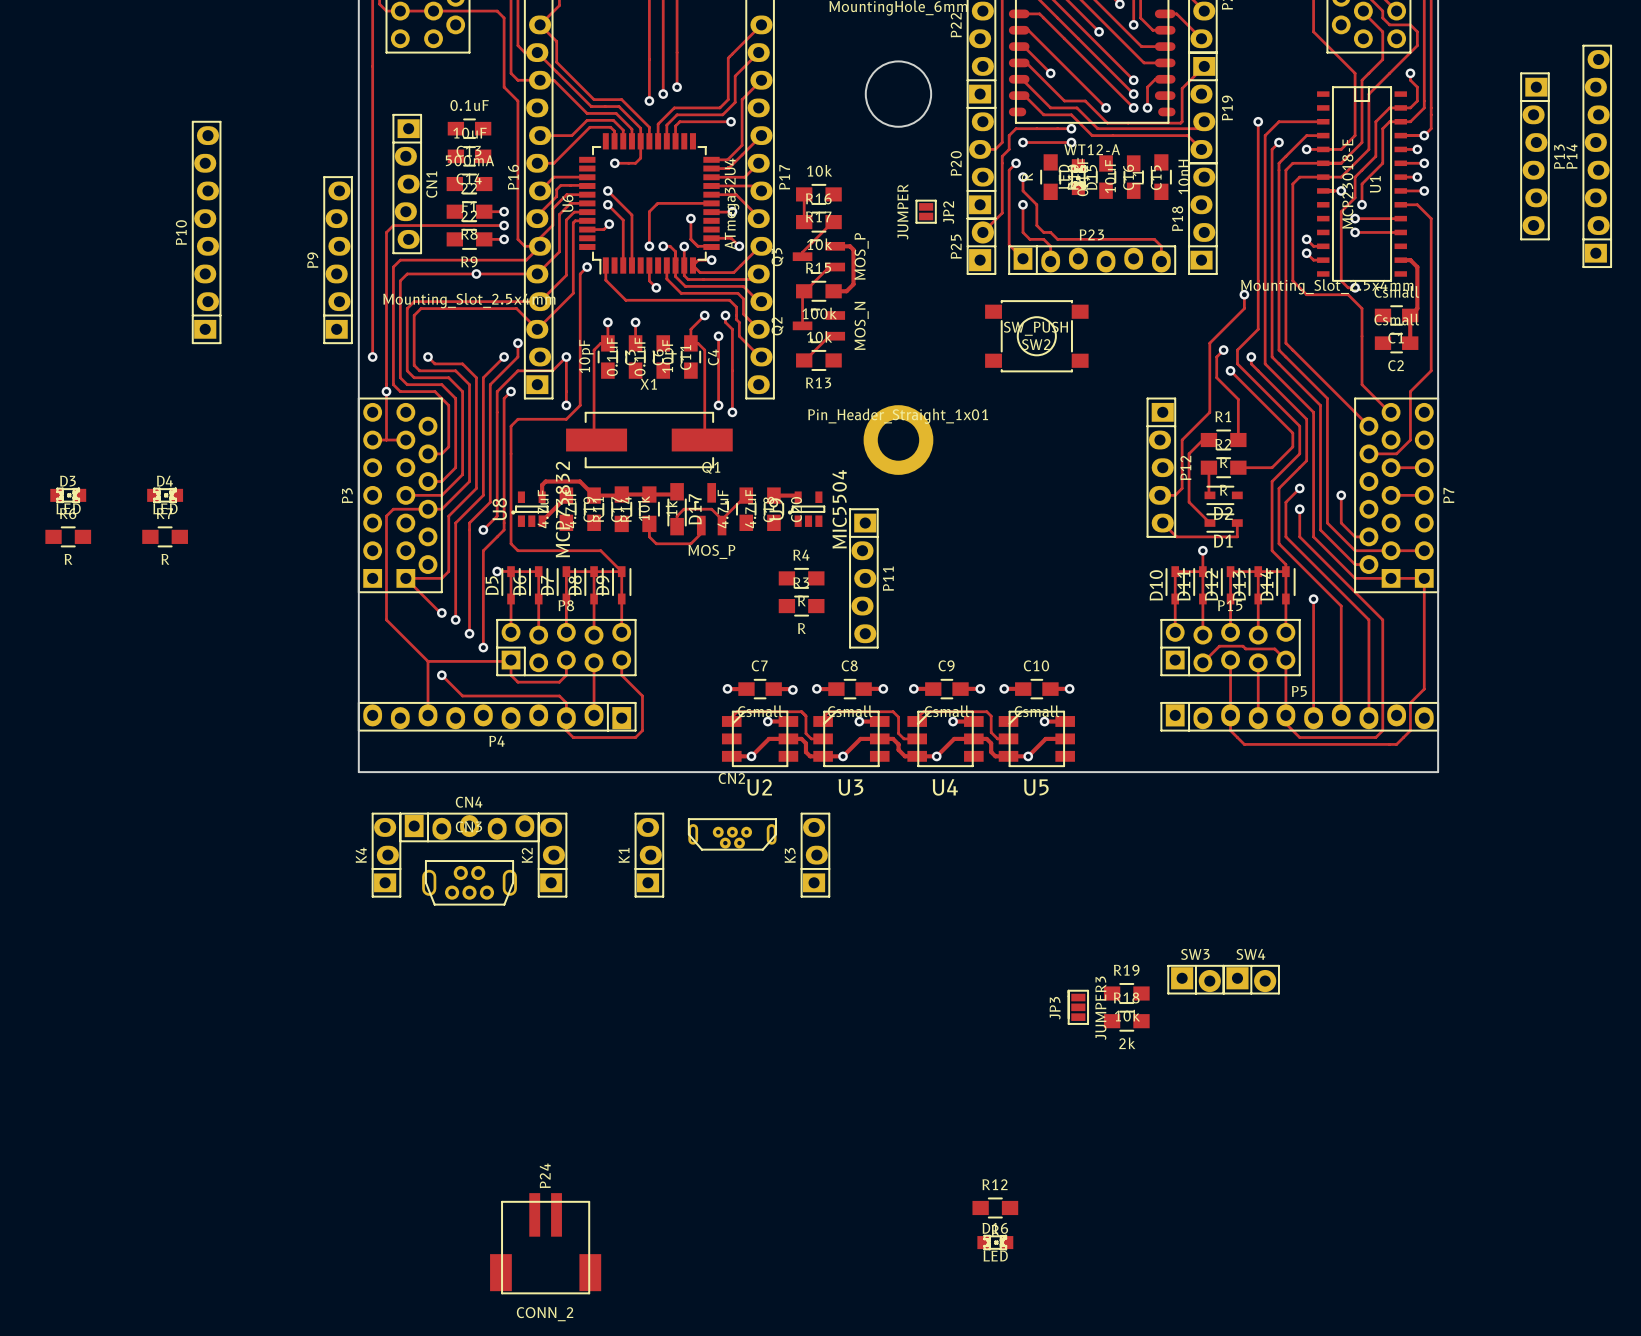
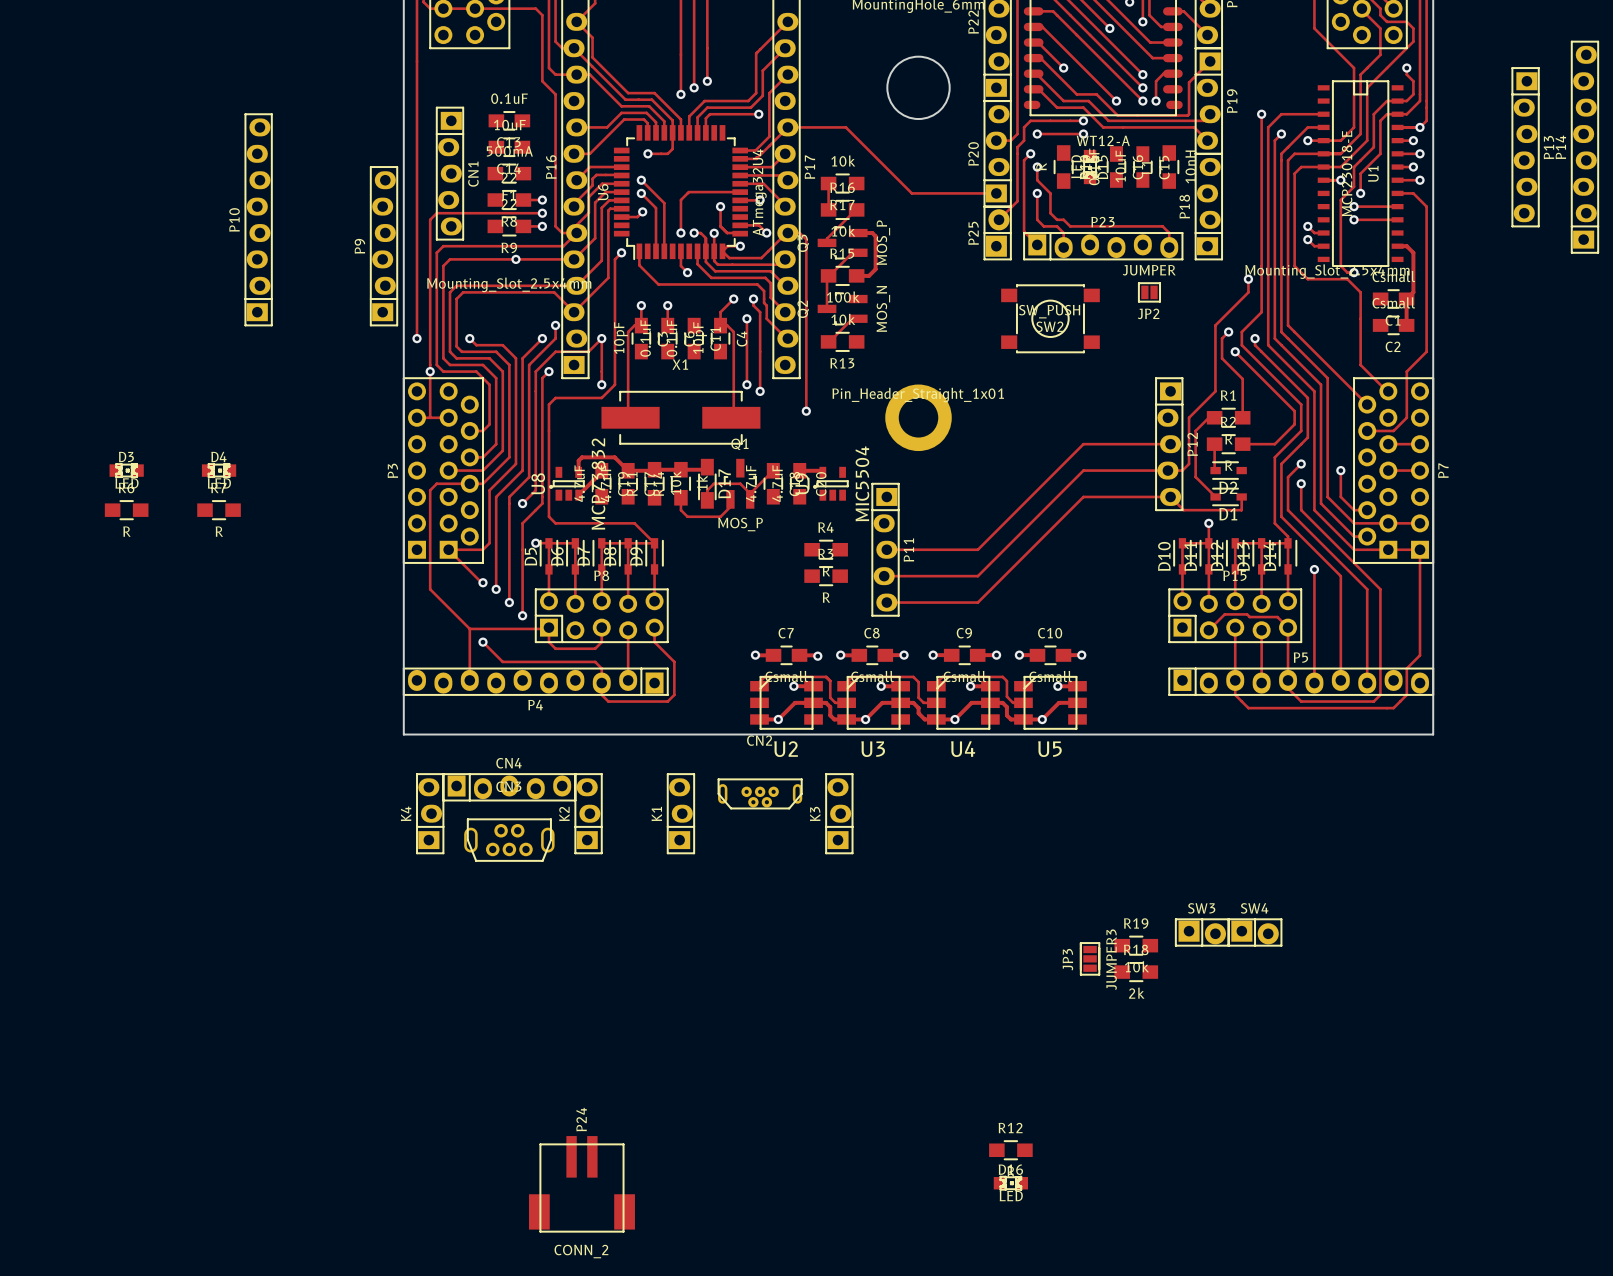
track: none -> (787, 127) (845, 127) (911, 193) (996, 193)
JP2 rotation: 0° (926, 211) -> 90° clockwise (1149, 292)
JP2 position: (926, 211) -> (1149, 292)
track: none -> (787, 233) (799, 233) (806, 239) (806, 411)
via: none -> (806, 411)
track: none -> (1170, 444) (1083, 444) (977, 549) (886, 549)
track: none -> (1167, 470) (1083, 470) (977, 576) (884, 576)
track: none -> (1170, 496) (1083, 496) (977, 602) (886, 602)

